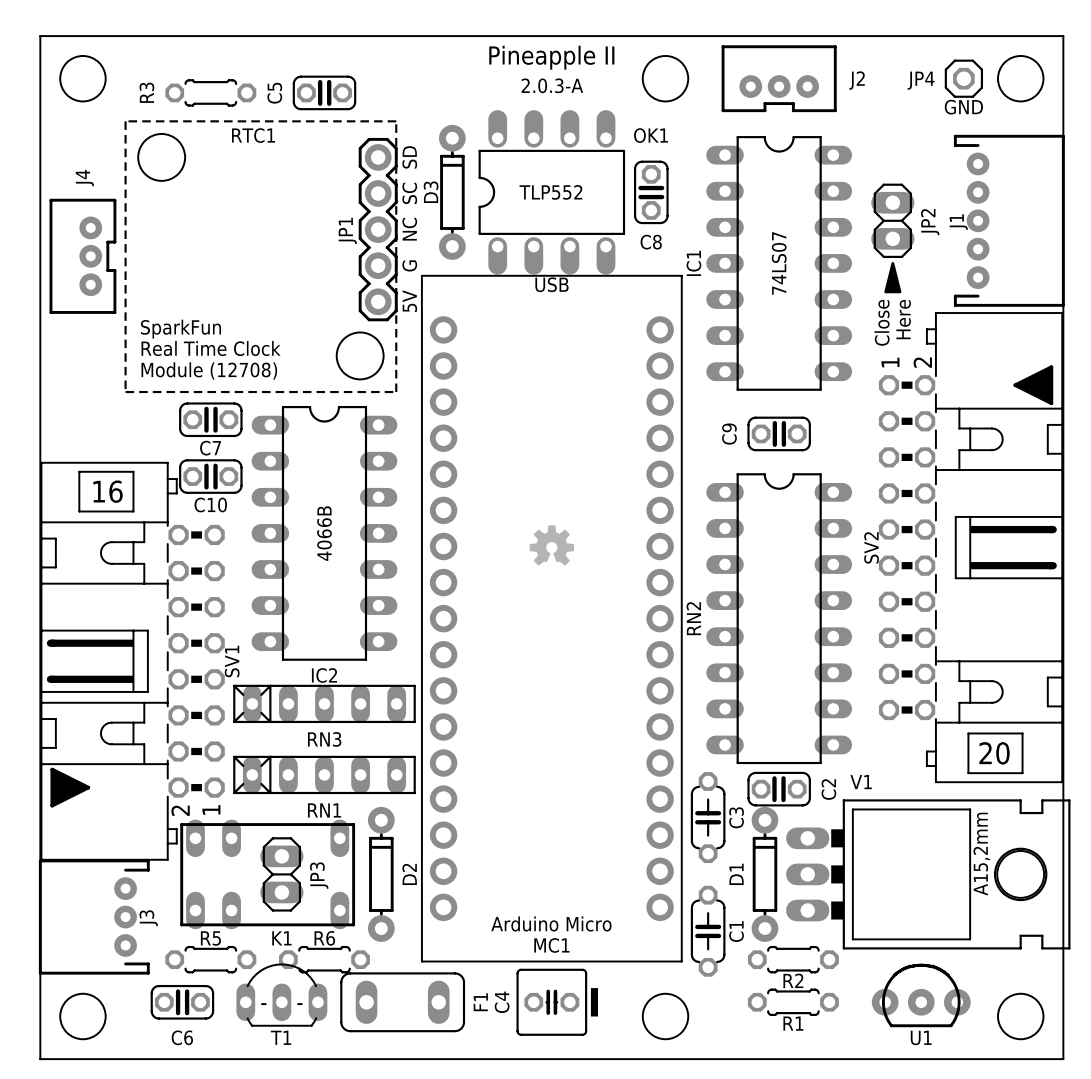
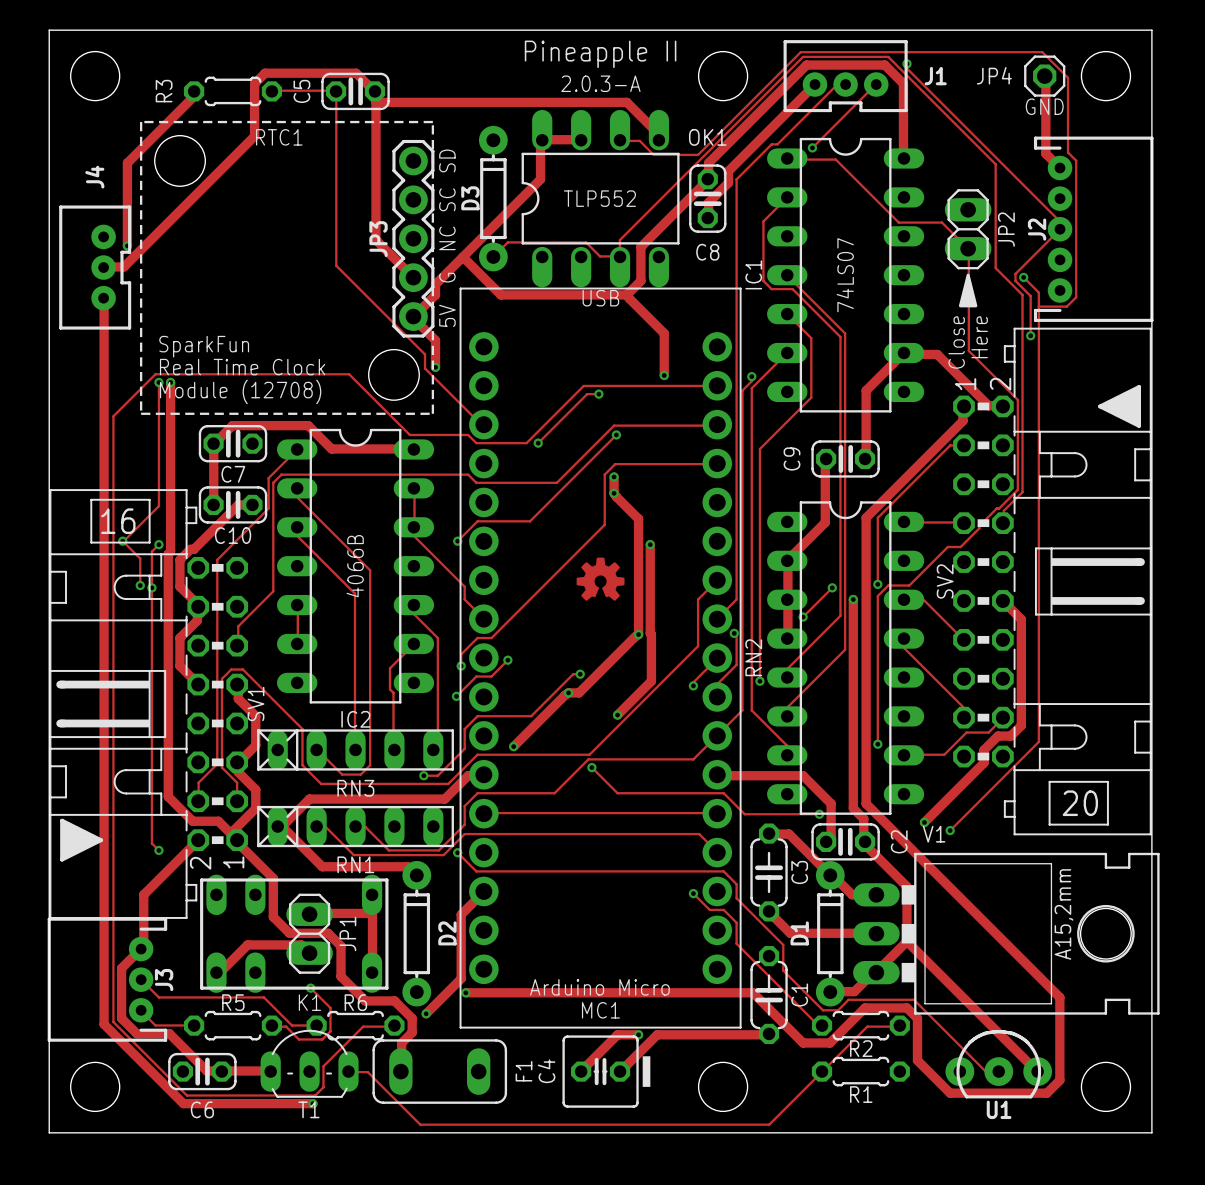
track: none -> (906, 63) (906, 68) (1059, 221) (1059, 229) (1015, 273) (1015, 280) (1030, 296) (1030, 335)
via: none -> (906, 63)
track: none -> (1044, 76) (1045, 153) (1060, 167)
J2 name: J2 (857, 80) -> J1 (935, 76)
track: none -> (814, 84) (728, 171) (728, 182) (708, 202) (707, 218)
track: none -> (845, 84) (836, 84) (777, 144) (771, 144) (736, 179) (736, 599) (717, 619)
track: none -> (876, 84) (812, 147)
track: none -> (194, 91) (193, 96) (127, 163) (127, 245)
track: none -> (271, 91) (336, 91) (336, 265) (425, 354) (425, 368) (481, 424) (483, 424)
track: none -> (376, 102) (626, 102) (658, 133) (658, 140)
track: none -> (581, 140) (542, 140) (540, 144) (540, 179) (435, 284) (435, 294) (413, 316) (435, 340) (435, 367)
track: none -> (620, 140) (639, 140) (653, 154) (698, 154) (800, 52) (1042, 52) (1068, 77) (1068, 152) (1076, 160) (1076, 297) (1066, 306) (1038, 306)
via: none -> (812, 147)
track: none -> (787, 158) (835, 159) (898, 222) (941, 222) (968, 249) (968, 350) (1017, 399) (1017, 489) (999, 508) (996, 508) (960, 547) (947, 547) (909, 585) (888, 585) (877, 596) (877, 744)
track: none -> (903, 158) (903, 83) (884, 65) (806, 65) (708, 163) (708, 178) (705, 182) (640, 247) (640, 280) (626, 294)
track: none -> (787, 197) (763, 221) (763, 280) (771, 289) (792, 289) (840, 336) (840, 615) (787, 668) (787, 677)
J1 name: J1 (958, 222) -> J2 (1037, 229)
JP1 name: JP1 (347, 230) -> JP3 (378, 239)
via: none -> (127, 245)
track: none -> (462, 257) (500, 294) (626, 294)
track: none -> (493, 256) (507, 242) (586, 242) (600, 256) (620, 256) (619, 240) (803, 56) (888, 56) (995, 164) (995, 268) (1022, 294) (1022, 492) (1003, 510) (1002, 523)
track: none -> (103, 267) (123, 266) (254, 136) (254, 83) (265, 73) (356, 73) (376, 91) (376, 240) (413, 277)
track: none -> (787, 275) (845, 333) (845, 649) (787, 706) (787, 716)
track: none -> (1023, 277) (1038, 292) (1038, 741) (950, 830)
via: none -> (1023, 277)
track: none -> (626, 294) (664, 333) (664, 375)
track: none -> (103, 298) (104, 1024) (183, 1103) (312, 1103)
track: none -> (787, 314) (811, 338) (811, 397) (759, 448) (759, 681)
via: none -> (1030, 335)
track: none -> (787, 353) (751, 388) (751, 710) (786, 745) (787, 755)
via: none -> (435, 367)
via: none -> (664, 375)
track: none -> (751, 376) (751, 381) (742, 390) (742, 710) (693, 759) (588, 759) (554, 793) (477, 793) (464, 806) (464, 824) (439, 850) (388, 850) (365, 827) (355, 826)
via: none -> (751, 376)
track: none -> (158, 382) (158, 506) (122, 541) (140, 558) (140, 585)
via: none -> (158, 382)
track: none -> (170, 382) (168, 796) (192, 821) (218, 821) (237, 839)
via: none -> (170, 382)
track: none -> (717, 385) (583, 385) (526, 443) (476, 443) (468, 434) (409, 434) (349, 374) (155, 374) (113, 416) (113, 1021) (186, 1095) (315, 1095) (323, 1087) (323, 1066) (363, 1026) (394, 1025)
track: none -> (598, 394) (587, 394) (538, 443)
via: none -> (598, 394)
track: none -> (964, 406) (962, 420) (866, 517) (866, 803) (1059, 997) (1059, 1080) (1047, 1093) (950, 1093) (917, 1060) (917, 1018) (906, 1007) (864, 1007) (829, 1042) (803, 1042) (752, 992) (465, 992)
track: none -> (1002, 406) (988, 405) (937, 354) (903, 353) (866, 390) (865, 458)
track: none -> (717, 424) (614, 425) (556, 482) (476, 482) (468, 474) (281, 474) (273, 482) (273, 591) (238, 626) (237, 645)
track: none -> (616, 434) (530, 521) (477, 521) (457, 541)
via: none -> (616, 434)
via: none -> (538, 443)
track: none -> (964, 445) (950, 445) (877, 517) (877, 584)
track: none -> (297, 449) (268, 478) (268, 508) (217, 559) (217, 764) (198, 782) (198, 801)
track: none -> (413, 449) (331, 448) (308, 425) (232, 425) (213, 443) (213, 504)
track: none -> (826, 458) (825, 522) (787, 560) (787, 638)
track: none -> (717, 463) (615, 464) (604, 474) (604, 524) (491, 638) (477, 638) (461, 654) (461, 666)
track: none -> (614, 476) (614, 493) (638, 518) (638, 634) (579, 692) (568, 692) (565, 695) (513, 746)
via: none -> (614, 476)
track: none -> (297, 488) (297, 497) (370, 570) (370, 765) (360, 774) (342, 774) (316, 749)
track: none -> (413, 488) (414, 536) (464, 586) (464, 599) (483, 619)
via: none -> (614, 493)
track: none -> (252, 504) (238, 504) (193, 549) (190, 549) (179, 559) (179, 586) (198, 606) (197, 620) (179, 638) (179, 666) (198, 684)
track: none -> (903, 521) (964, 523)
track: none -> (297, 527) (297, 536) (354, 593) (355, 749)
via: none -> (122, 541)
via: none -> (457, 541)
track: none -> (158, 544) (151, 551) (151, 843) (158, 850)
via: none -> (158, 544)
track: none -> (650, 544) (651, 681) (617, 715)
via: none -> (650, 544)
track: none -> (717, 580) (698, 599) (698, 646) (589, 754) (477, 754) (448, 783) (321, 783) (302, 765) (302, 729) (242, 669) (231, 669) (221, 678) (221, 767) (237, 782) (237, 801)
via: none -> (877, 584)
via: none -> (140, 585)
via: none -> (151, 587)
track: none -> (832, 587) (803, 617)
via: none -> (832, 587)
track: none -> (853, 599) (853, 808) (863, 818) (863, 837) (866, 845) (906, 886) (906, 941)
via: none -> (853, 599)
track: none -> (903, 599) (924, 600) (964, 639)
track: none -> (1002, 600) (1021, 619) (1021, 725) (1010, 736) (998, 736) (984, 750) (984, 762) (924, 822)
track: none -> (297, 605) (297, 643)
track: none -> (413, 605) (414, 614) (437, 638) (437, 745) (433, 749)
via: none -> (803, 617)
track: none -> (734, 633) (736, 635) (736, 664) (717, 683) (717, 696)
via: none -> (734, 633)
via: none -> (638, 634)
track: none -> (903, 638) (904, 648) (962, 706) (964, 717)
track: none -> (413, 643) (390, 668) (390, 689) (393, 692) (394, 749)
track: none -> (717, 658) (693, 682) (693, 685)
track: none -> (507, 660) (491, 676) (476, 676) (456, 696)
via: none -> (507, 660)
via: none -> (461, 666)
track: none -> (580, 674) (573, 674) (531, 716) (477, 716) (464, 729) (464, 748) (437, 775) (423, 775)
via: none -> (580, 674)
via: none -> (759, 681)
track: none -> (237, 684) (238, 698) (255, 716) (255, 745) (237, 762) (238, 772) (255, 789) (255, 808) (233, 830) (237, 840) (273, 878) (273, 916) (289, 933) (328, 933) (340, 946) (340, 976) (365, 1000) (394, 1000) (412, 1018) (412, 1032) (401, 1042) (400, 1071)
via: none -> (693, 685)
via: none -> (568, 692)
via: none -> (456, 696)
via: none -> (617, 715)
track: none -> (1002, 717) (988, 732) (966, 732) (944, 754) (903, 755)
via: none -> (877, 744)
via: none -> (513, 746)
track: none -> (591, 767) (617, 793) (723, 793) (744, 814) (819, 814)
via: none -> (591, 767)
track: none -> (483, 774) (468, 775) (444, 799) (309, 799) (284, 823) (277, 826) (282, 827) (322, 866) (407, 866) (416, 875)
track: none -> (717, 774) (803, 775) (831, 803) (831, 836) (826, 841)
via: none -> (423, 775)
track: none -> (483, 813) (717, 813)
via: none -> (819, 814)
via: none -> (924, 822)
track: none -> (316, 826) (325, 827) (353, 855) (443, 855) (464, 834) (699, 834) (717, 852)
via: none -> (950, 830)
track: none -> (769, 833) (789, 834) (852, 894) (876, 894)
track: none -> (198, 840) (143, 894) (143, 944) (121, 968) (121, 1018) (136, 1033) (169, 1033) (206, 1070) (270, 1071)
via: none -> (158, 850)
track: none -> (457, 852) (476, 871) (723, 871) (736, 884) (736, 898) (783, 944) (783, 970) (822, 1010) (838, 1010) (848, 999) (913, 999) (985, 1070) (998, 1071)
via: none -> (457, 852)
track: none -> (483, 891) (461, 914) (461, 978) (426, 1013)
track: none -> (693, 893) (709, 909) (723, 909) (736, 922) (736, 943) (818, 1025) (821, 1025)
via: none -> (693, 893)
track: none -> (769, 911) (790, 933) (876, 933)
track: none -> (309, 914) (368, 913) (372, 894) (372, 972)
JP3 name: JP3 (319, 875) -> JP1 (347, 934)
track: none -> (906, 941) (854, 991) (830, 992)
track: none -> (906, 941) (1037, 1071)
track: none -> (309, 953) (301, 944) (247, 944) (220, 971) (216, 972)
track: none -> (141, 979) (158, 997) (263, 997) (291, 1025) (316, 1025)
track: none -> (310, 988) (330, 1007) (330, 1031) (322, 1039) (298, 1039) (286, 1026) (271, 1025)
via: none -> (310, 988)
via: none -> (465, 992)
track: none -> (141, 1010) (155, 1025) (193, 1025)
via: none -> (426, 1013)
track: none -> (899, 1025) (867, 1026) (769, 1124) (420, 1124) (367, 1072) (348, 1071)
track: none -> (769, 1033) (657, 1034) (620, 1071)
track: none -> (638, 1034) (617, 1034) (581, 1071)
via: none -> (638, 1034)
via: none -> (312, 1103)

